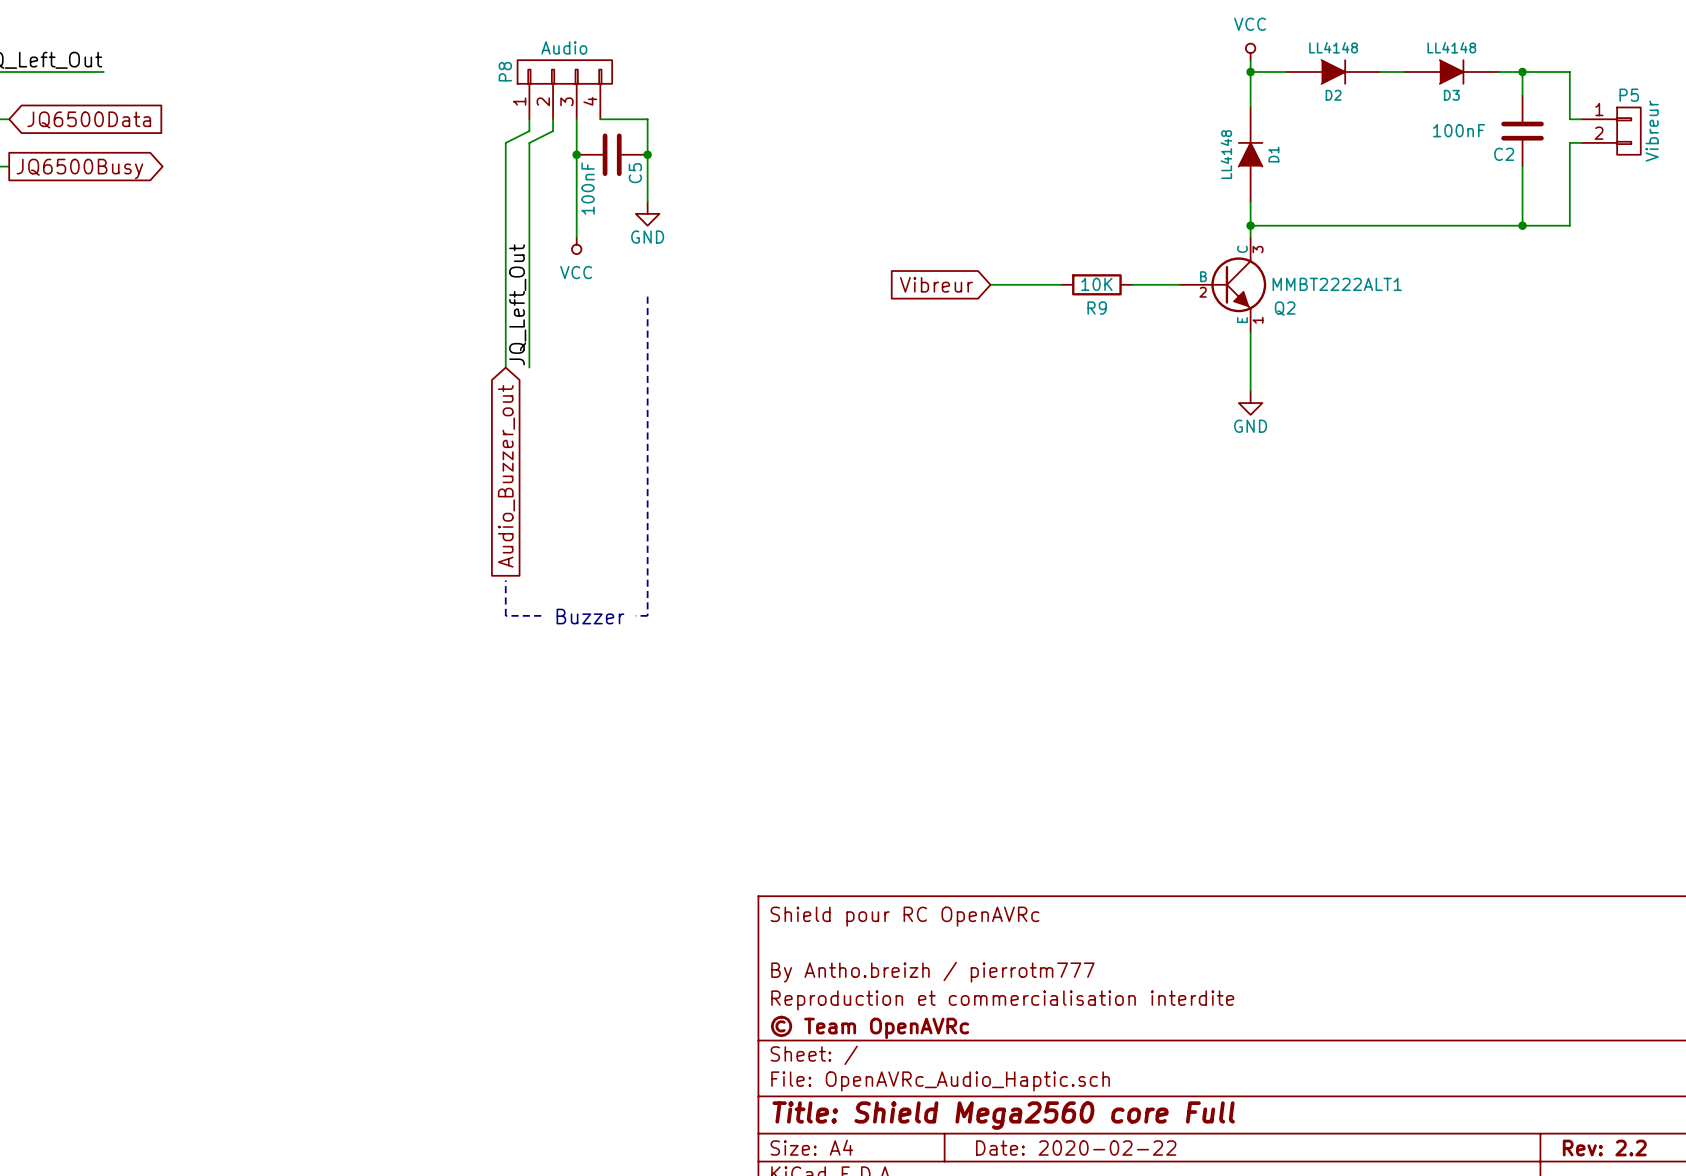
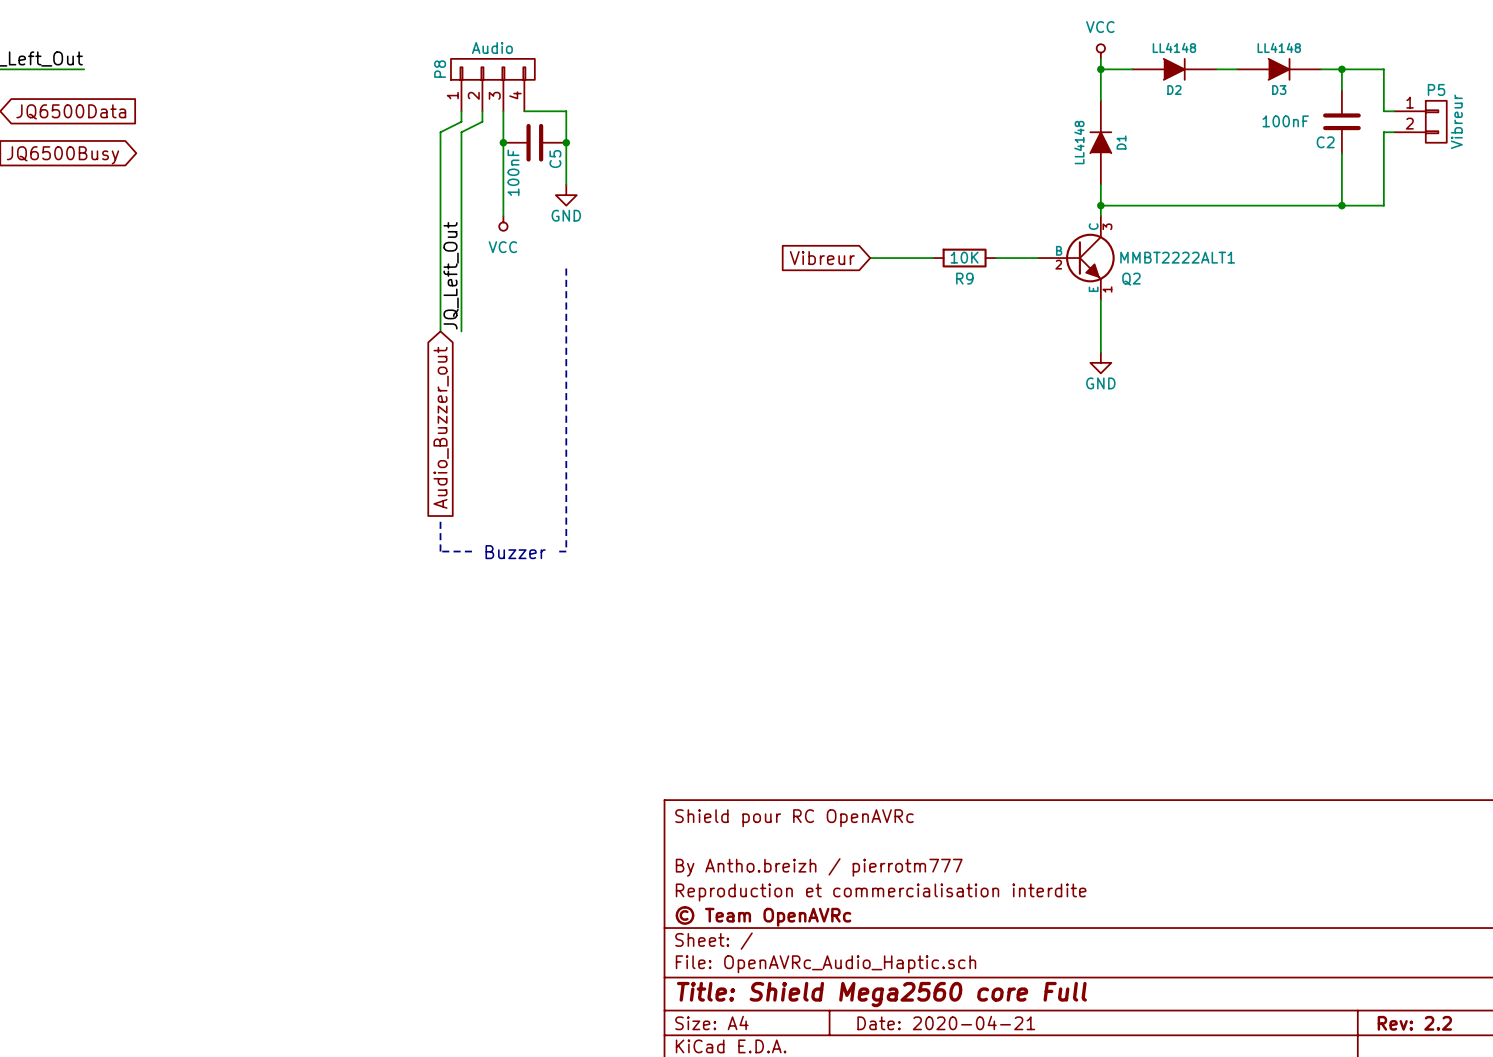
title block: Date: 2020-02-22 (1076, 1148) -> Date: 2020-04-21 (946, 1023)

